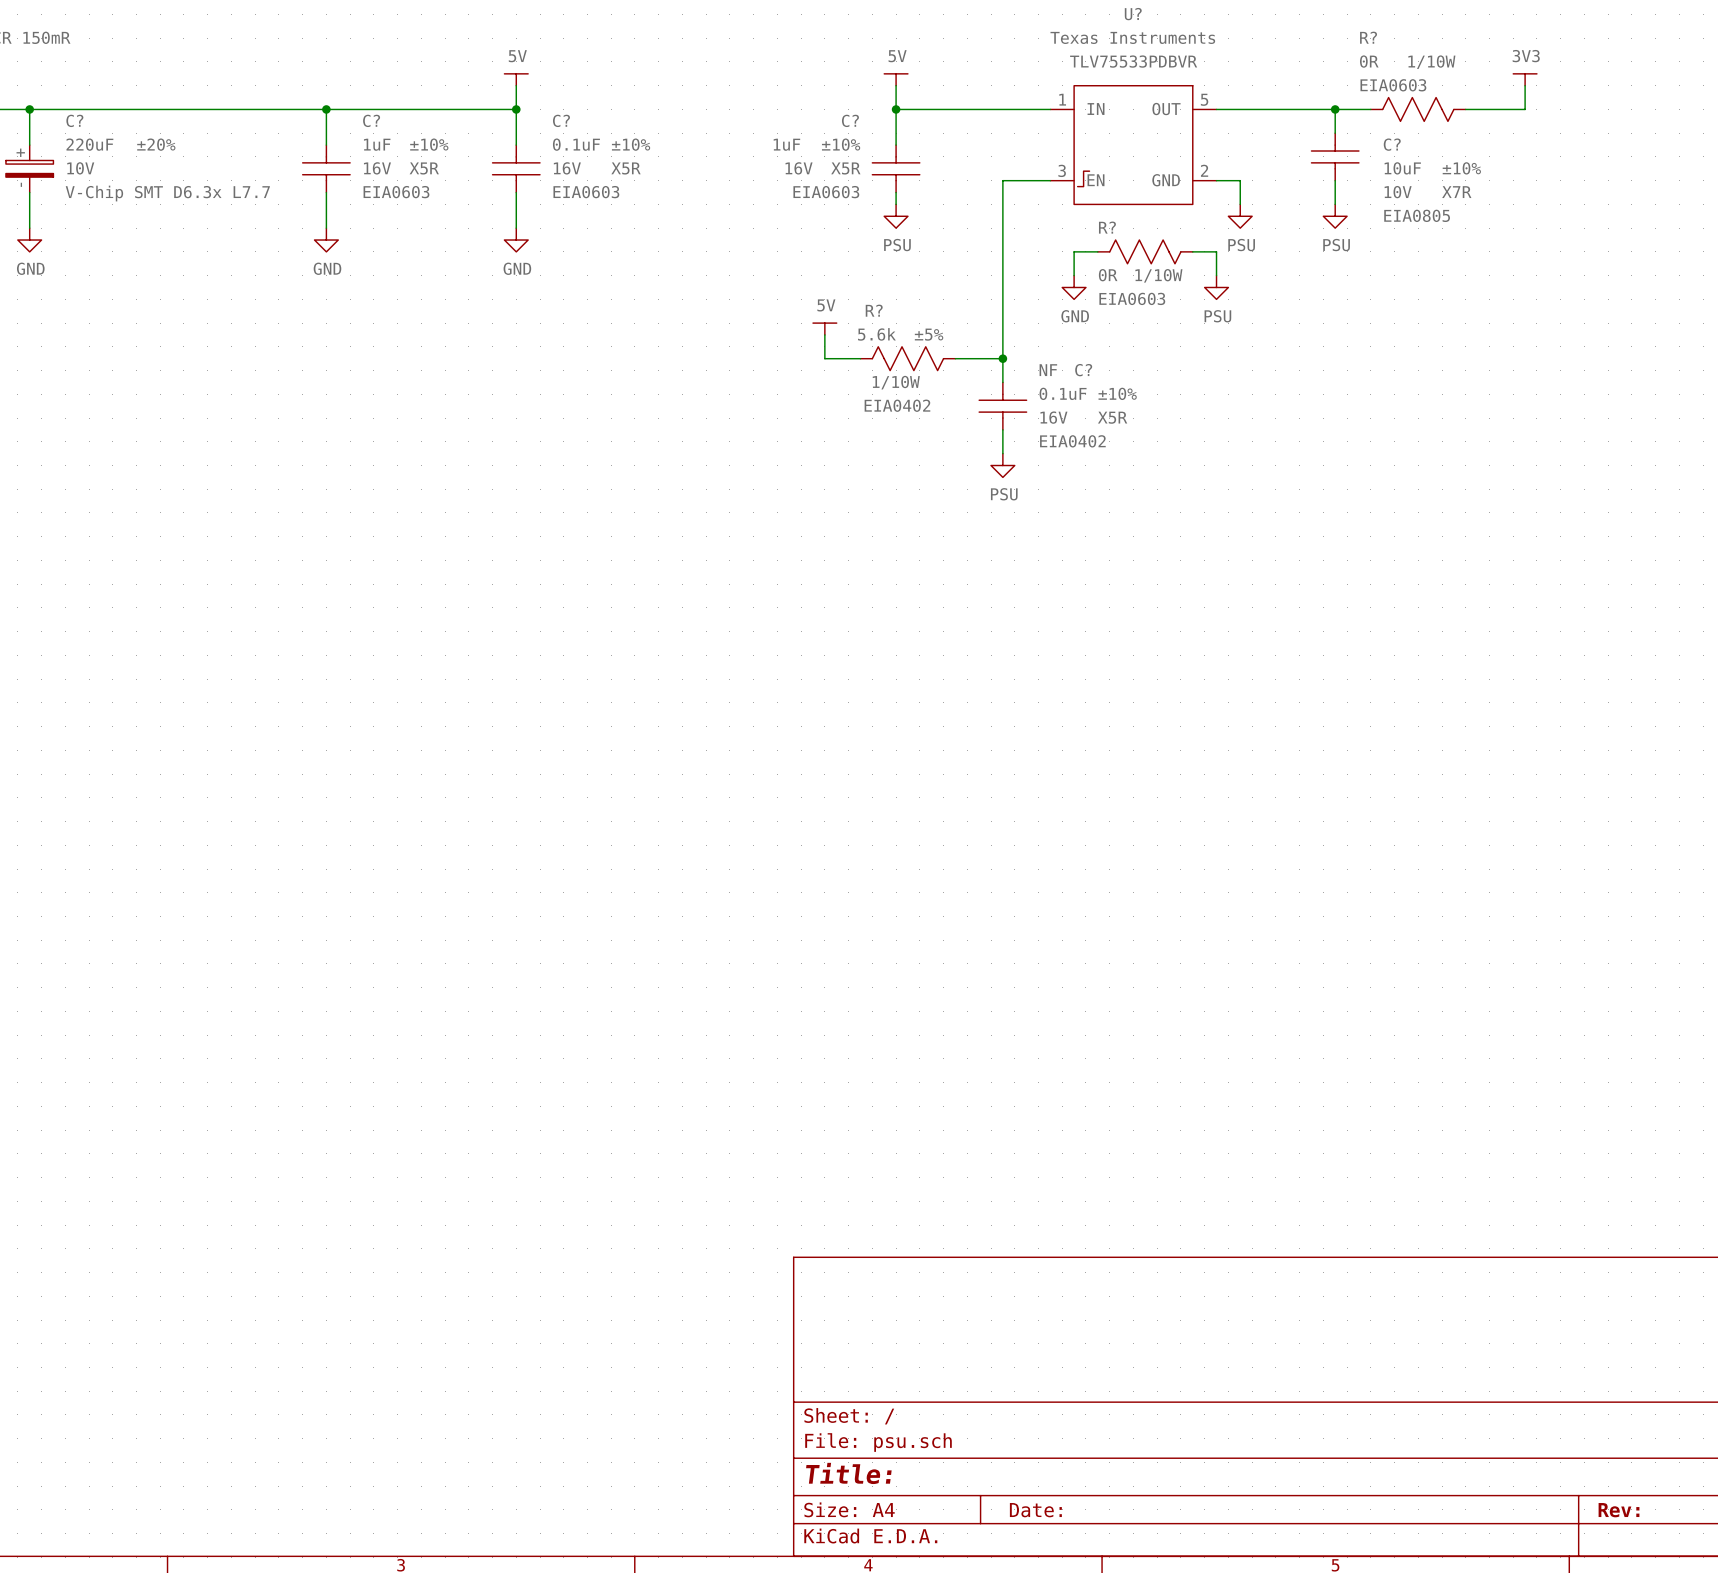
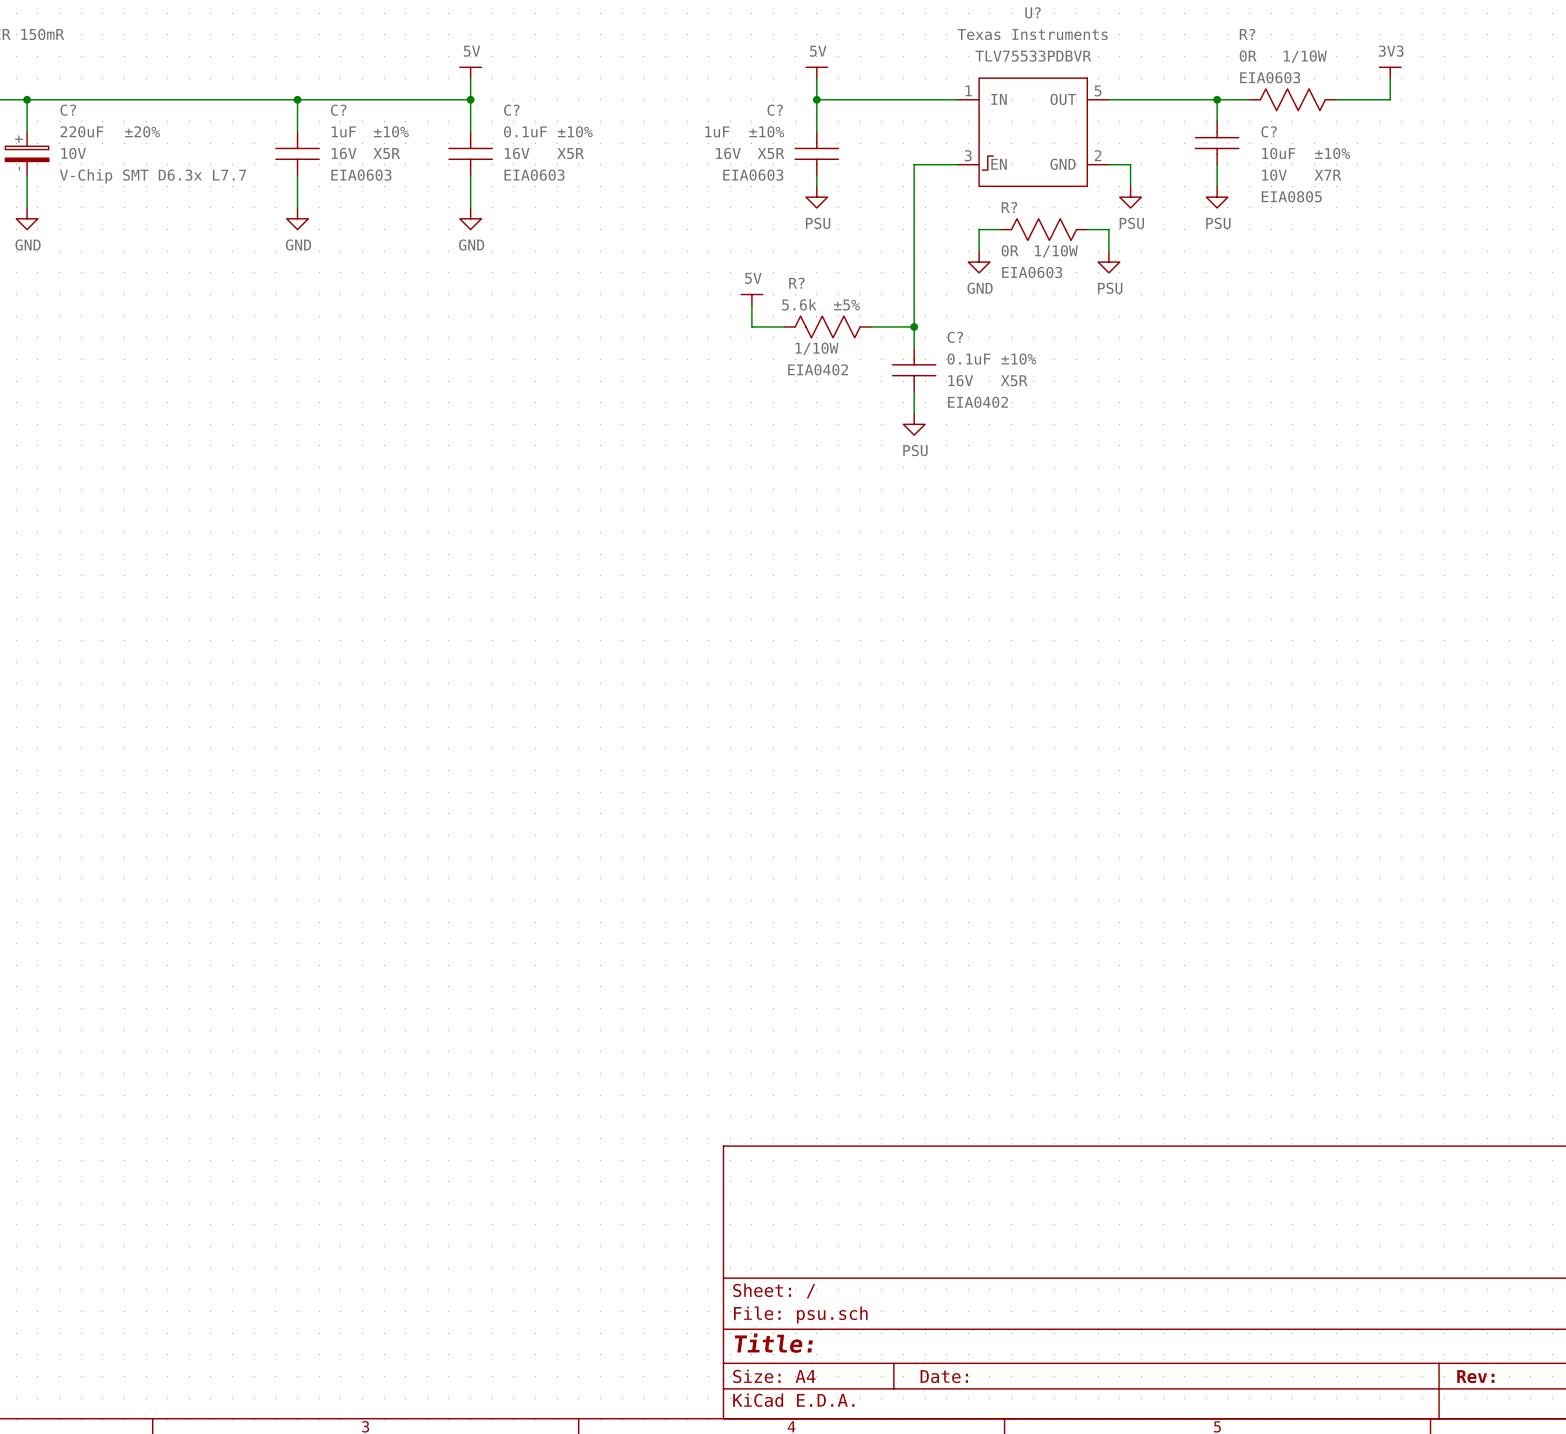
C? text: NF (1048, 370) -> none
C? name position: C? (1083, 370) -> C? (955, 337)

